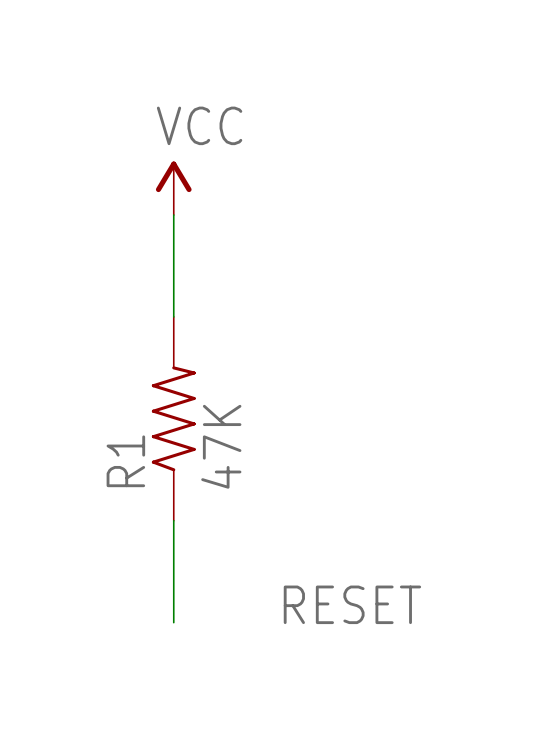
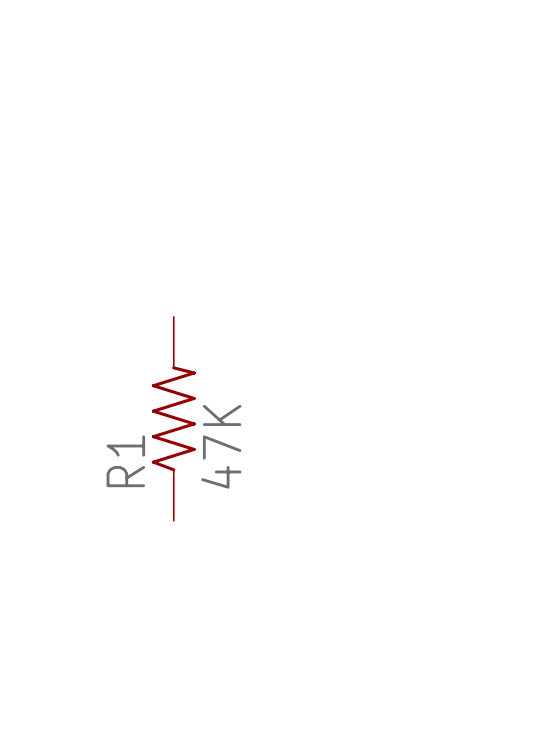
power symbol: VCC (173, 188) -> none
wire: (173, 215) (173, 316) -> none
wire: (173, 520) (173, 622) -> none
label: RESET (352, 604) -> none

